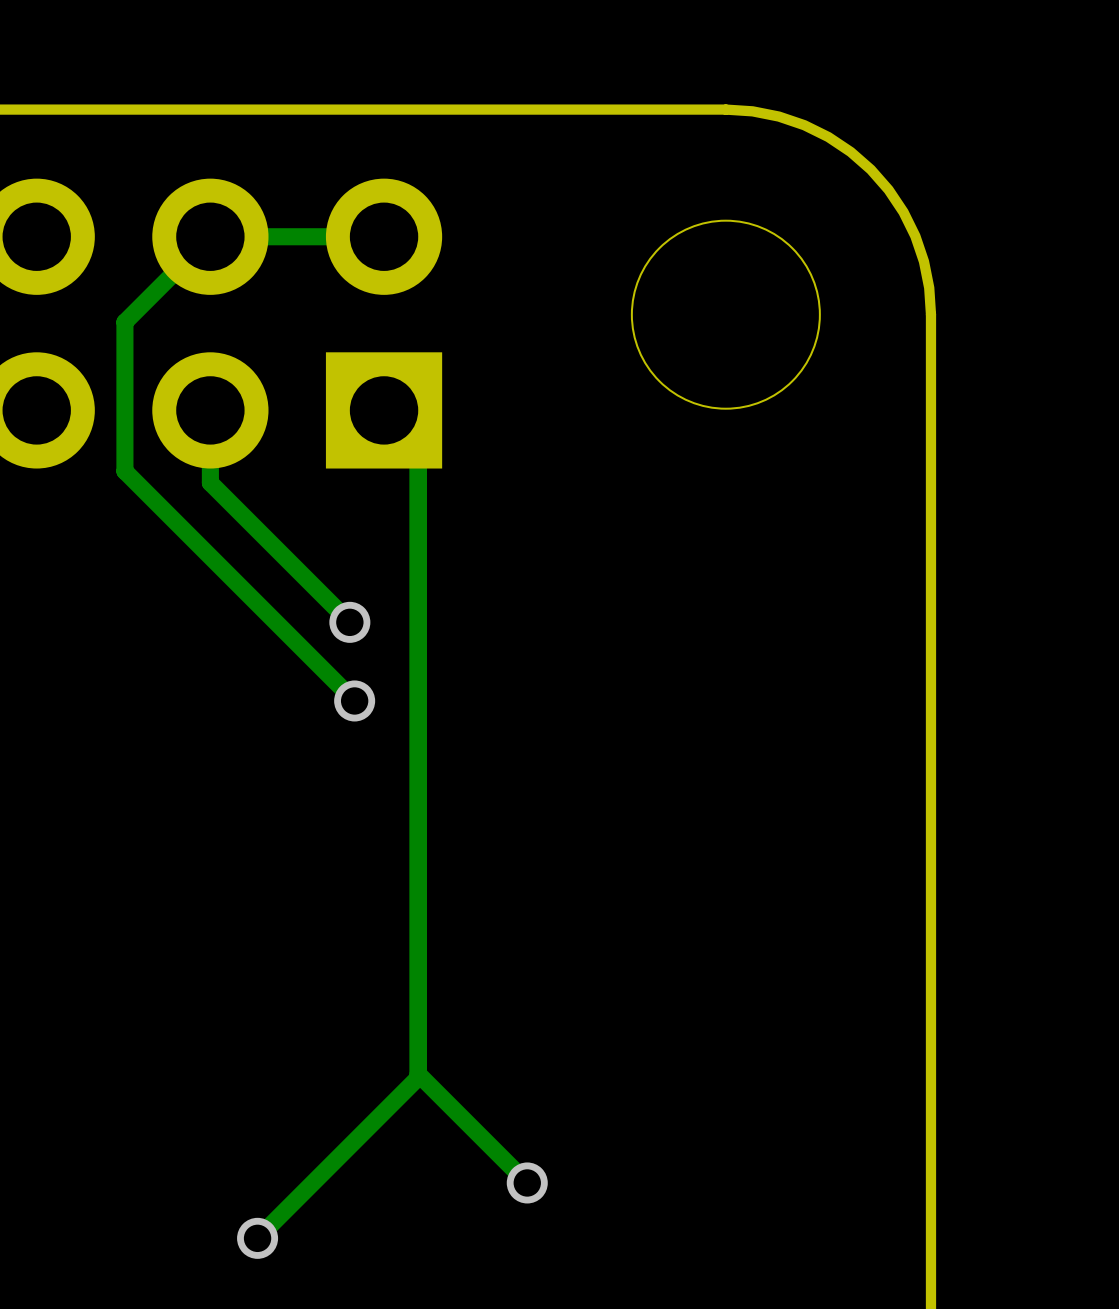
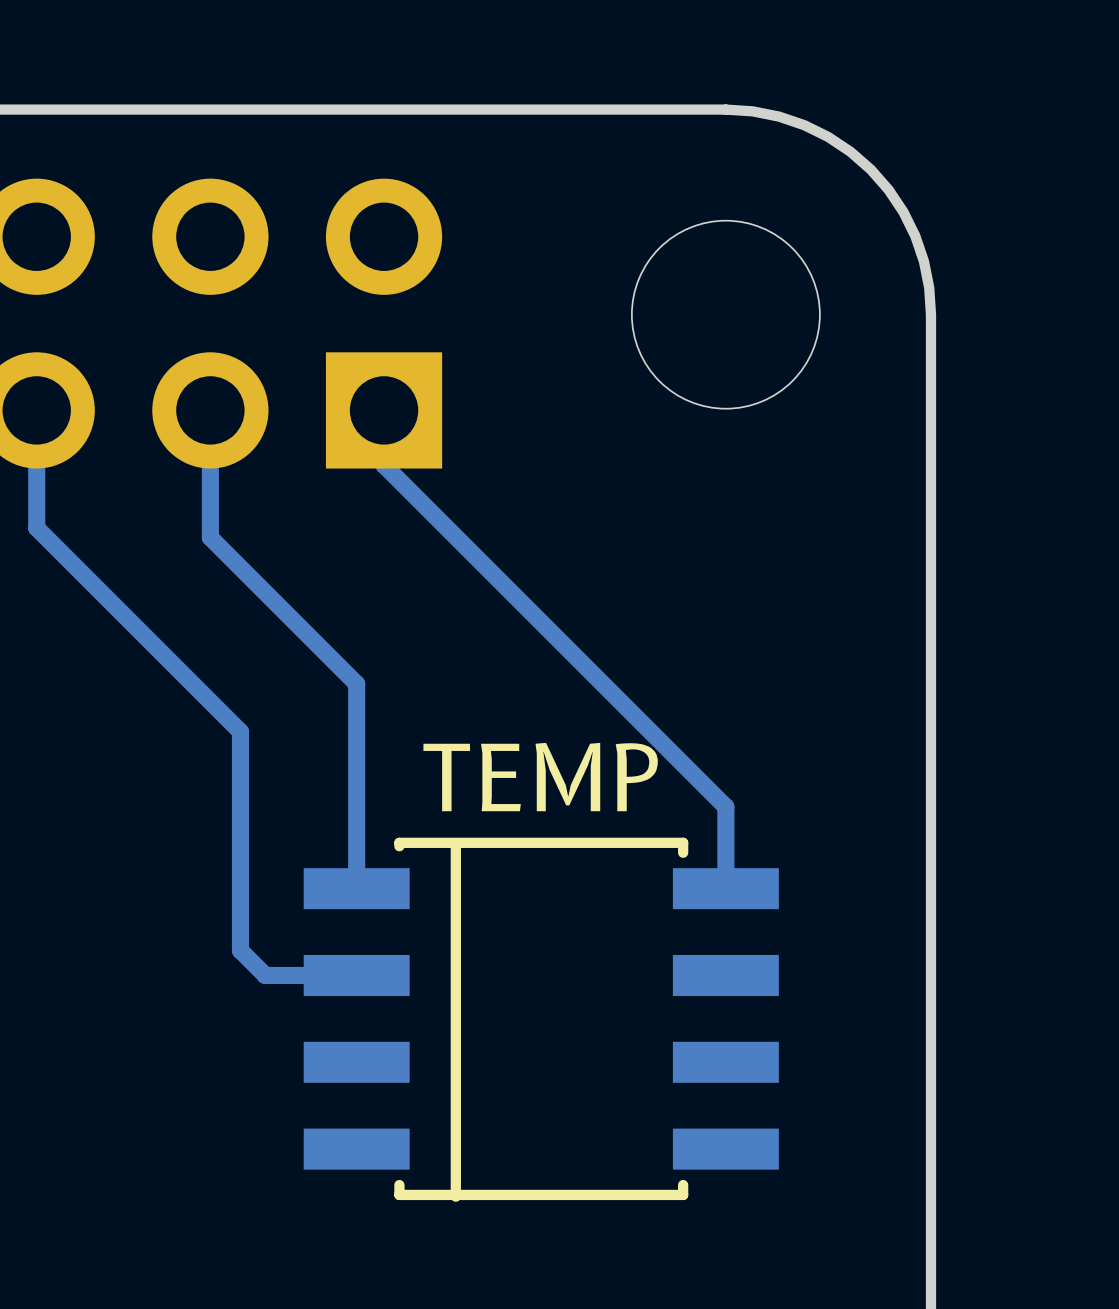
track: (384, 236) (210, 236) (124, 322) (124, 471) (354, 700) -> none
track: (384, 410) (418, 444) (418, 1077) (257, 1238) -> (384, 413) (384, 465) (725, 806) (725, 888)
track: none -> (36, 413) (36, 528) (240, 731) (240, 950) (265, 975) (356, 975)
track: (210, 482) (349, 622) -> (210, 482) (210, 537) (356, 683) (356, 888)
via: (349, 622) -> none
via: (354, 700) -> none
TEMP: none -> (541, 1019)
track: (418, 1073) (527, 1182) -> none
via: (527, 1182) -> none
via: (257, 1238) -> none

